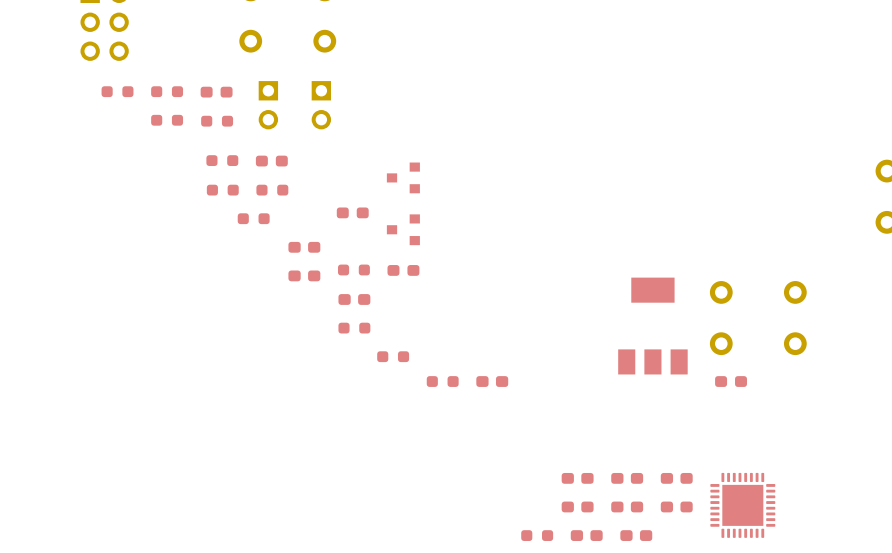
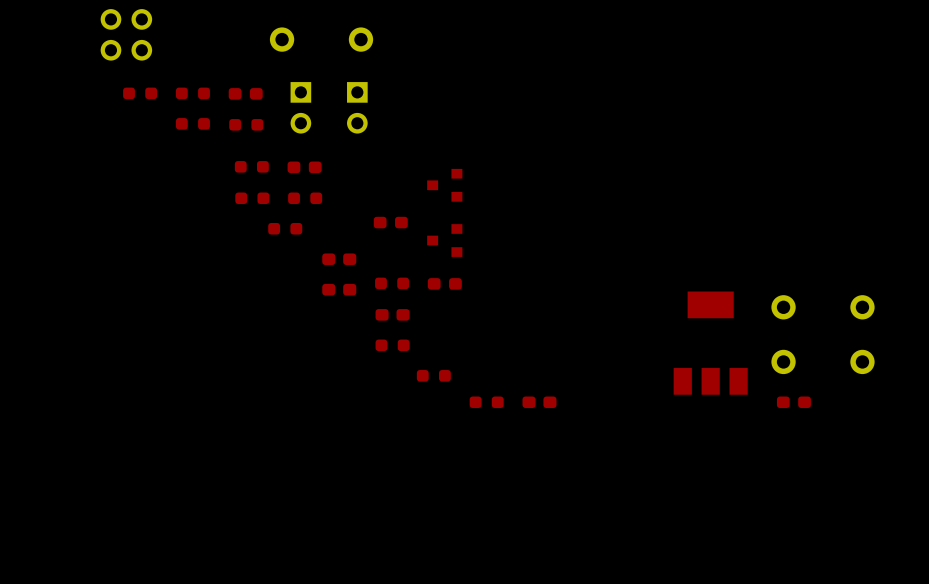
part: (577, 478) -> none
part: (627, 478) -> none
part: (676, 478) -> none
part: (742, 505) -> none
part: (577, 506) -> none
part: (627, 506) -> none
part: (676, 506) -> none
part: (537, 535) -> none
part: (586, 535) -> none
part: (636, 535) -> none

